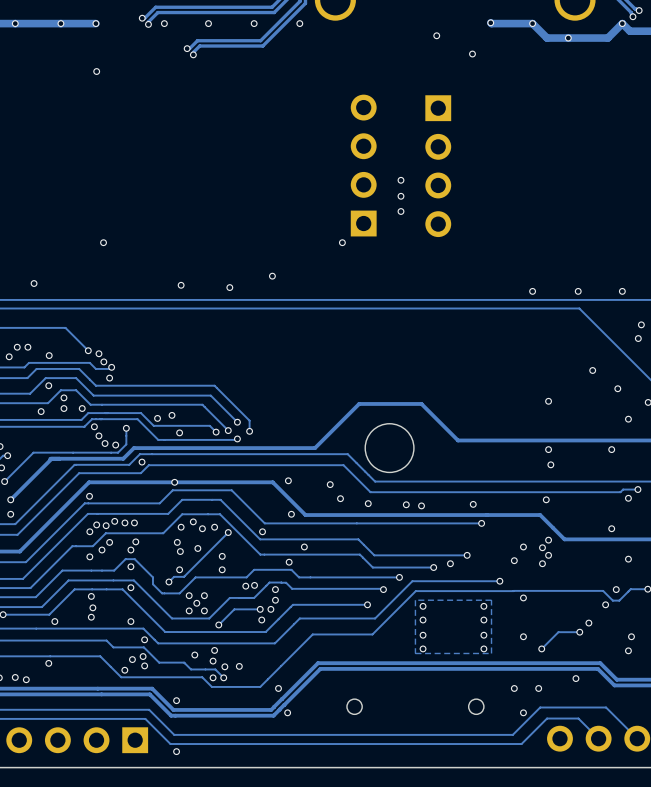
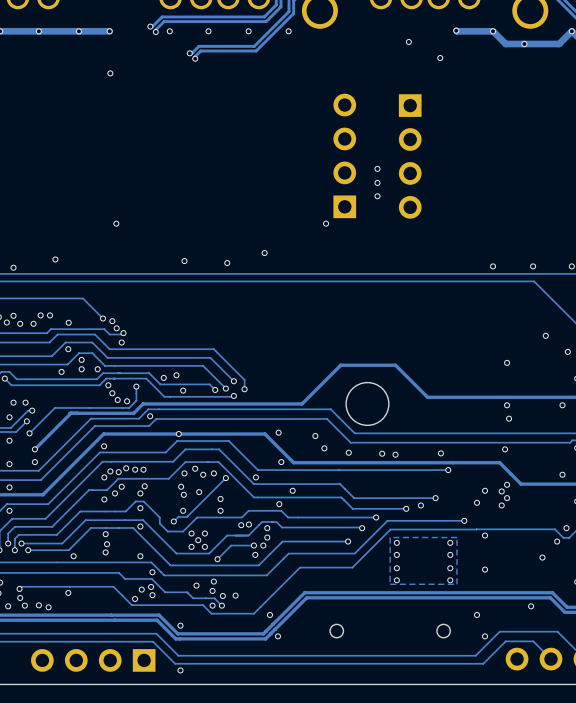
track: (579, 632) (558, 632) (541, 648) -> none
via: (579, 632) -> none
via: (541, 648) -> none
via: (538, 688) -> none

